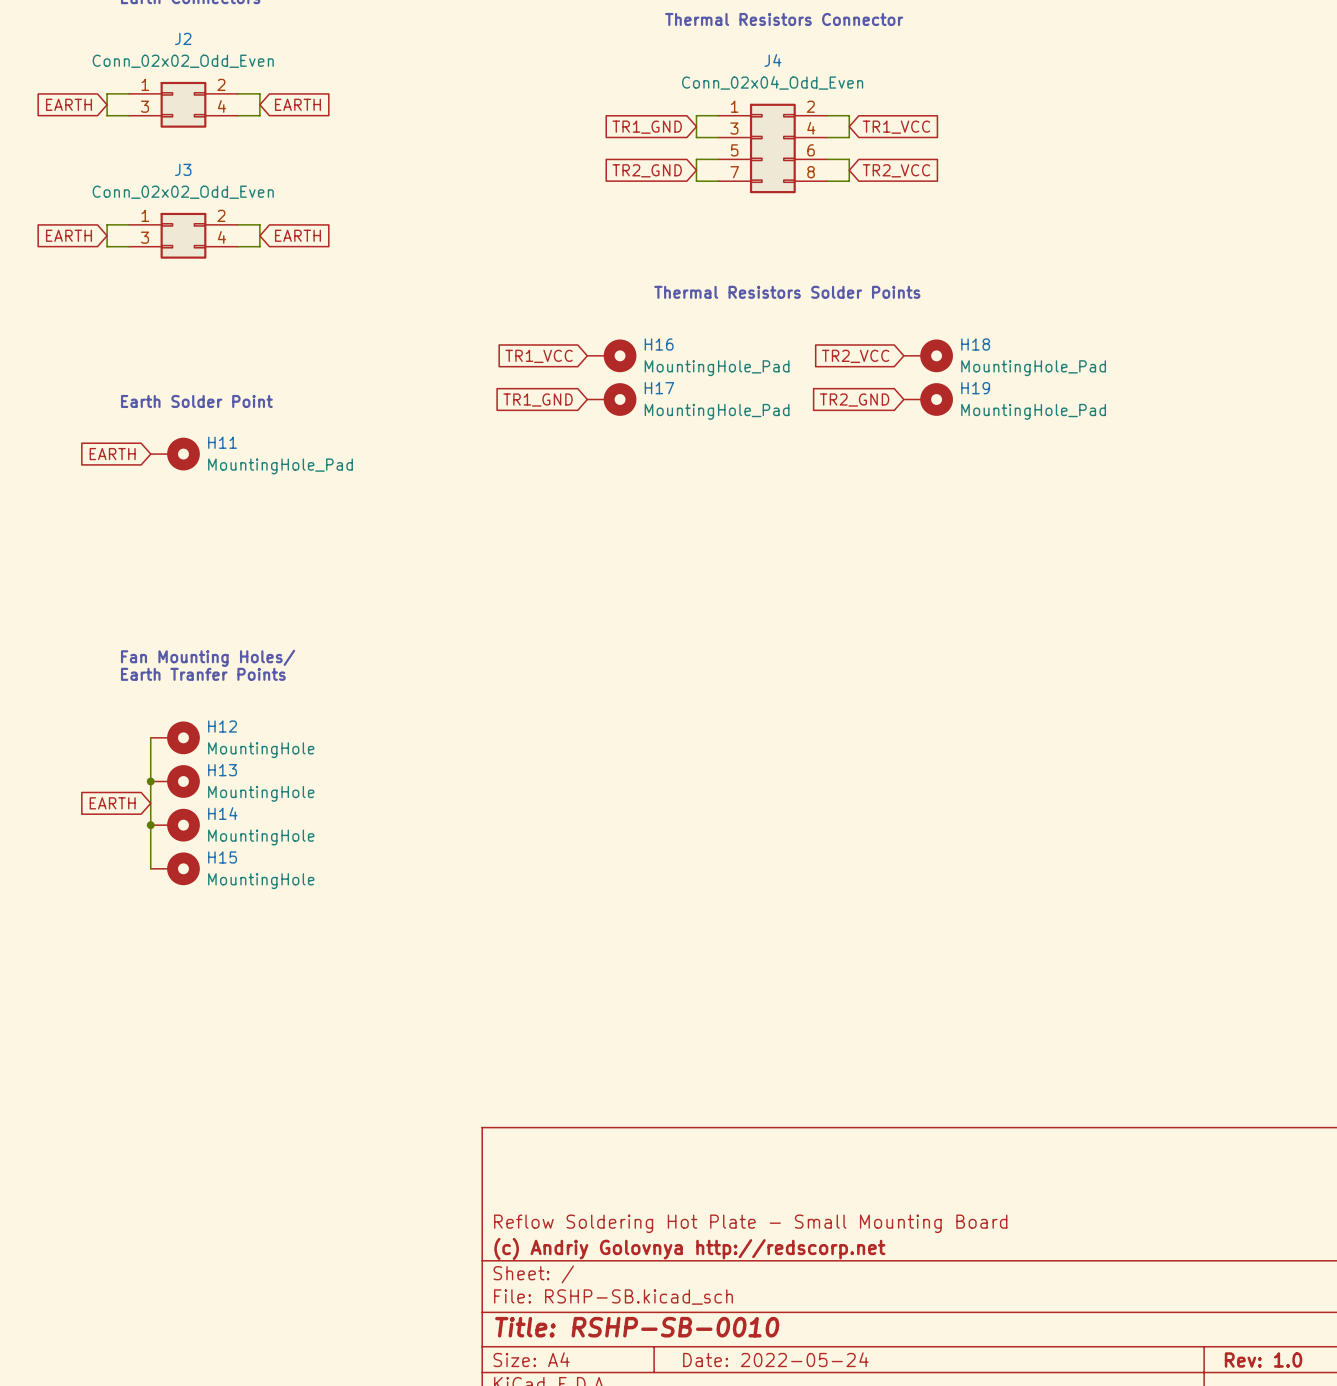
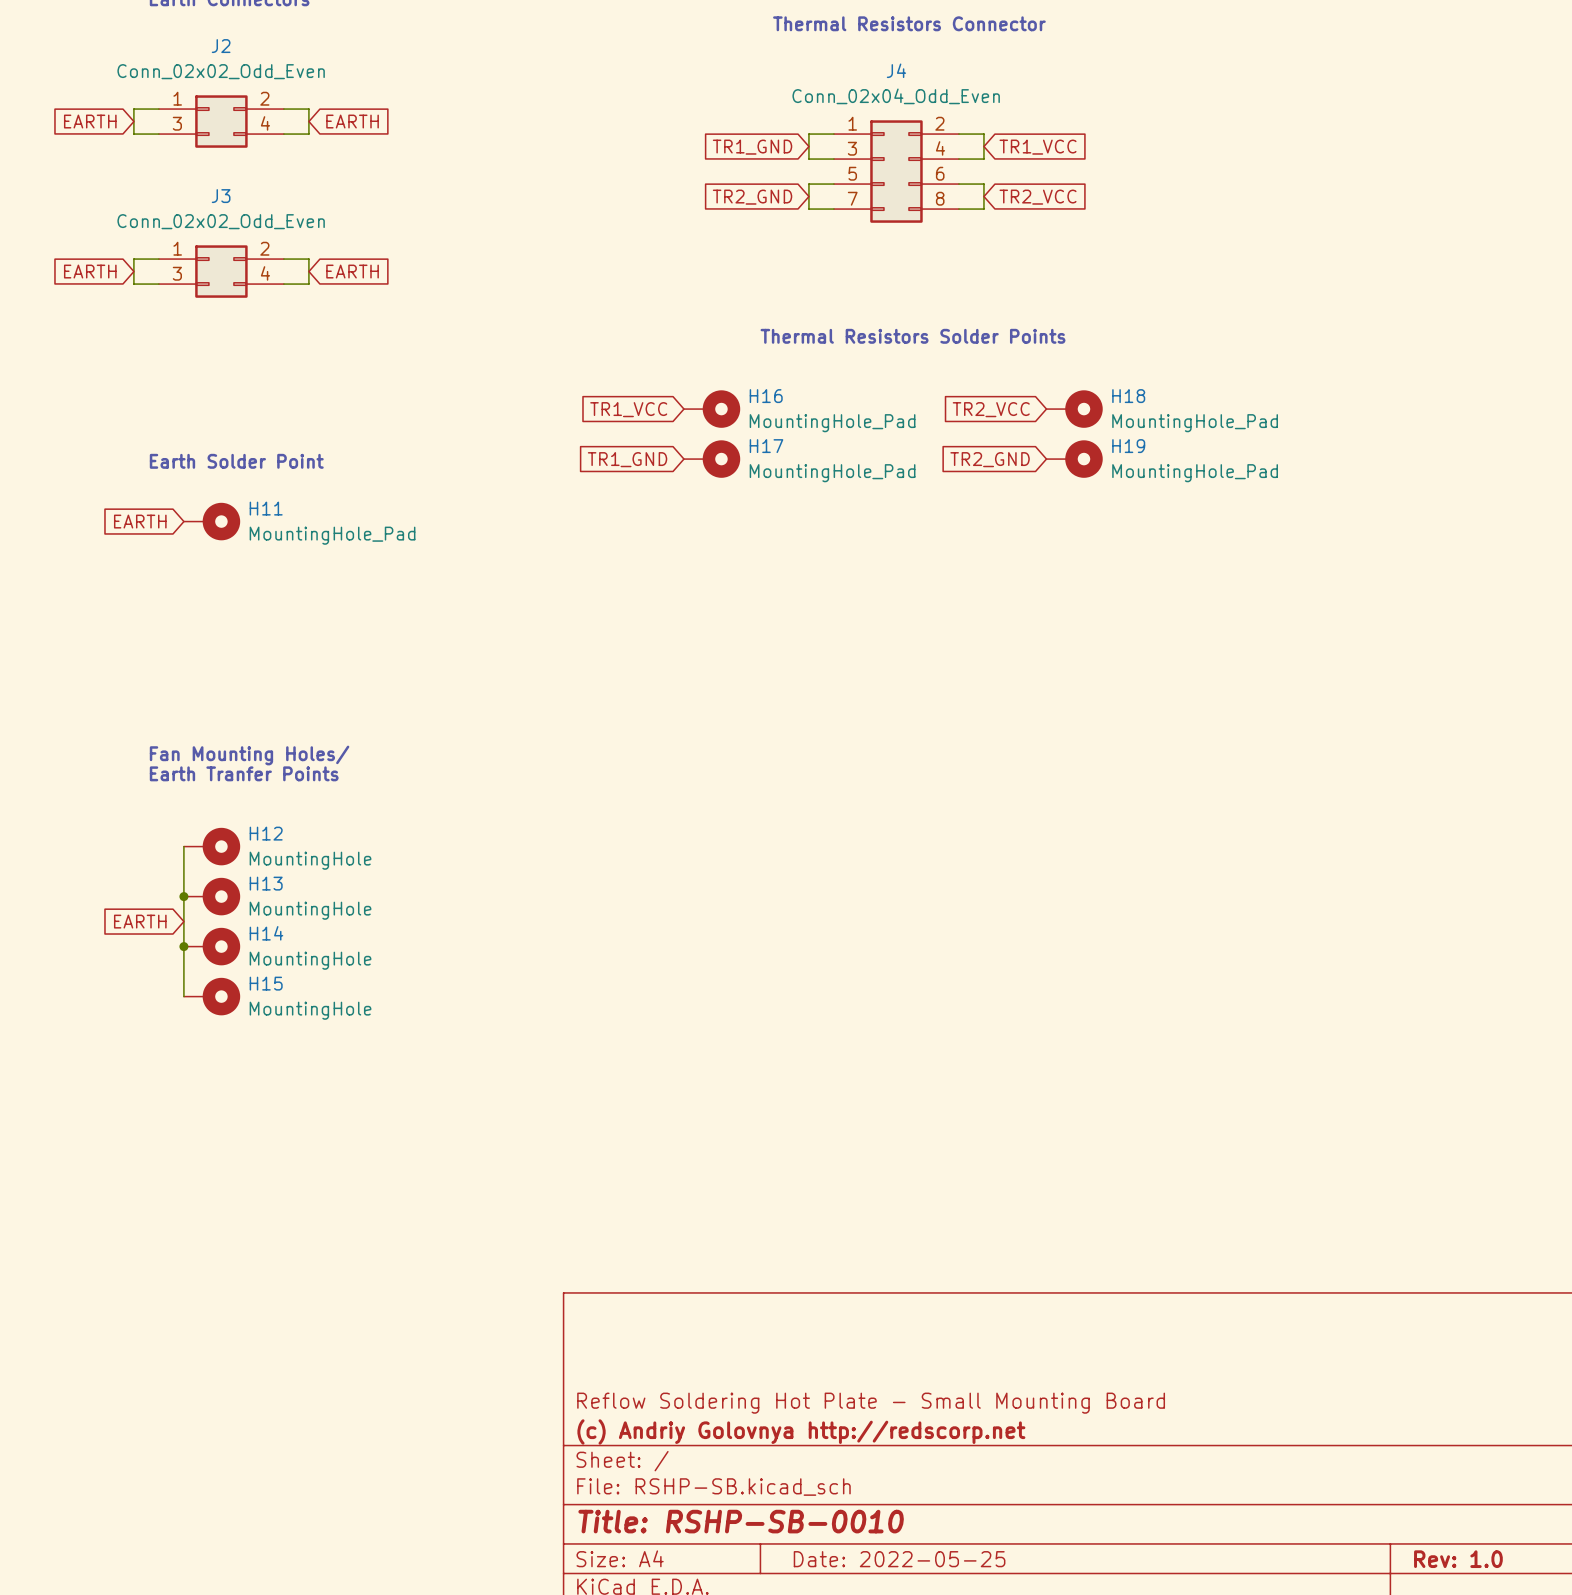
title block: Date: 2022-05-24 (775, 1359) -> Date: 2022-05-25 (899, 1559)

